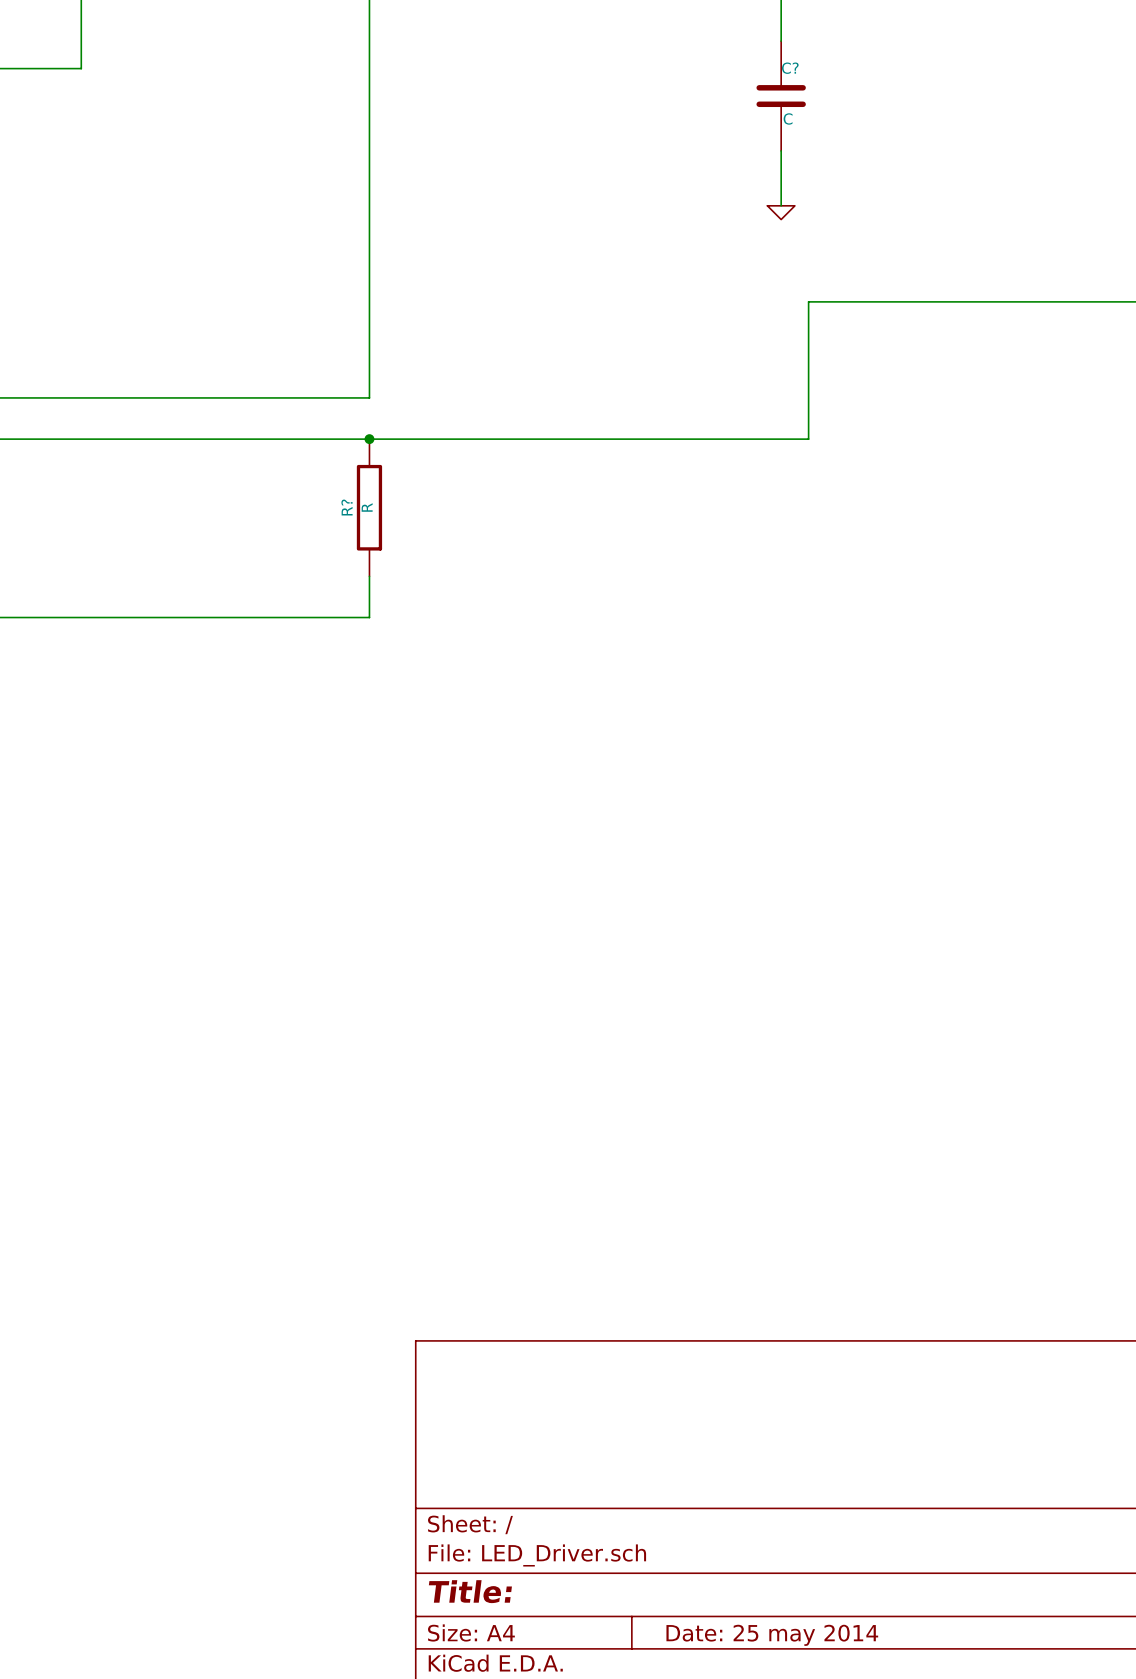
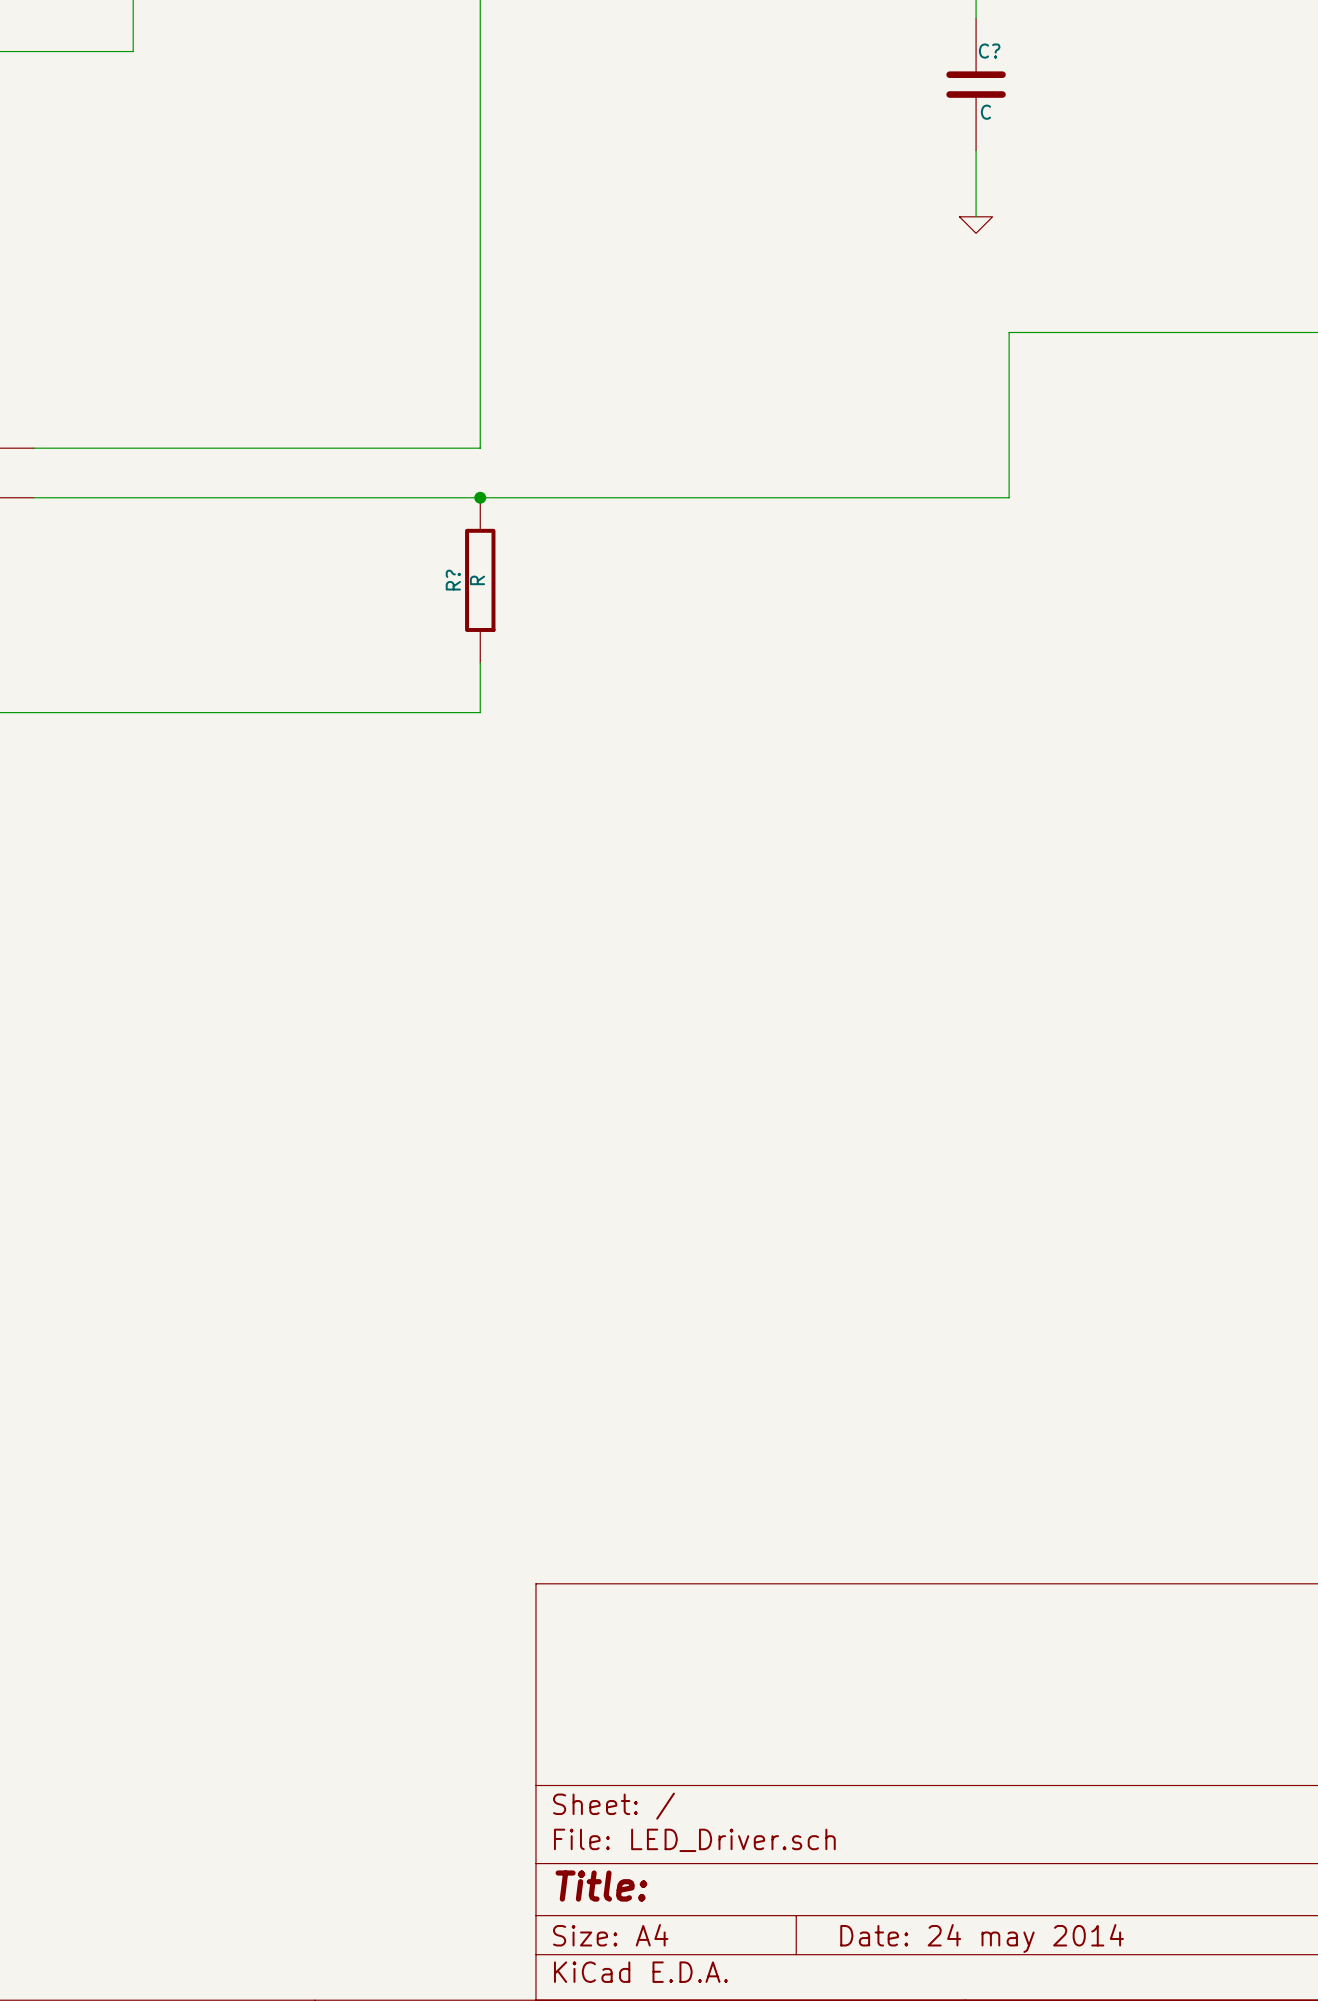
title block: Date: 25 may 2014 (772, 1635) -> Date: 24 may 2014 (982, 1938)

